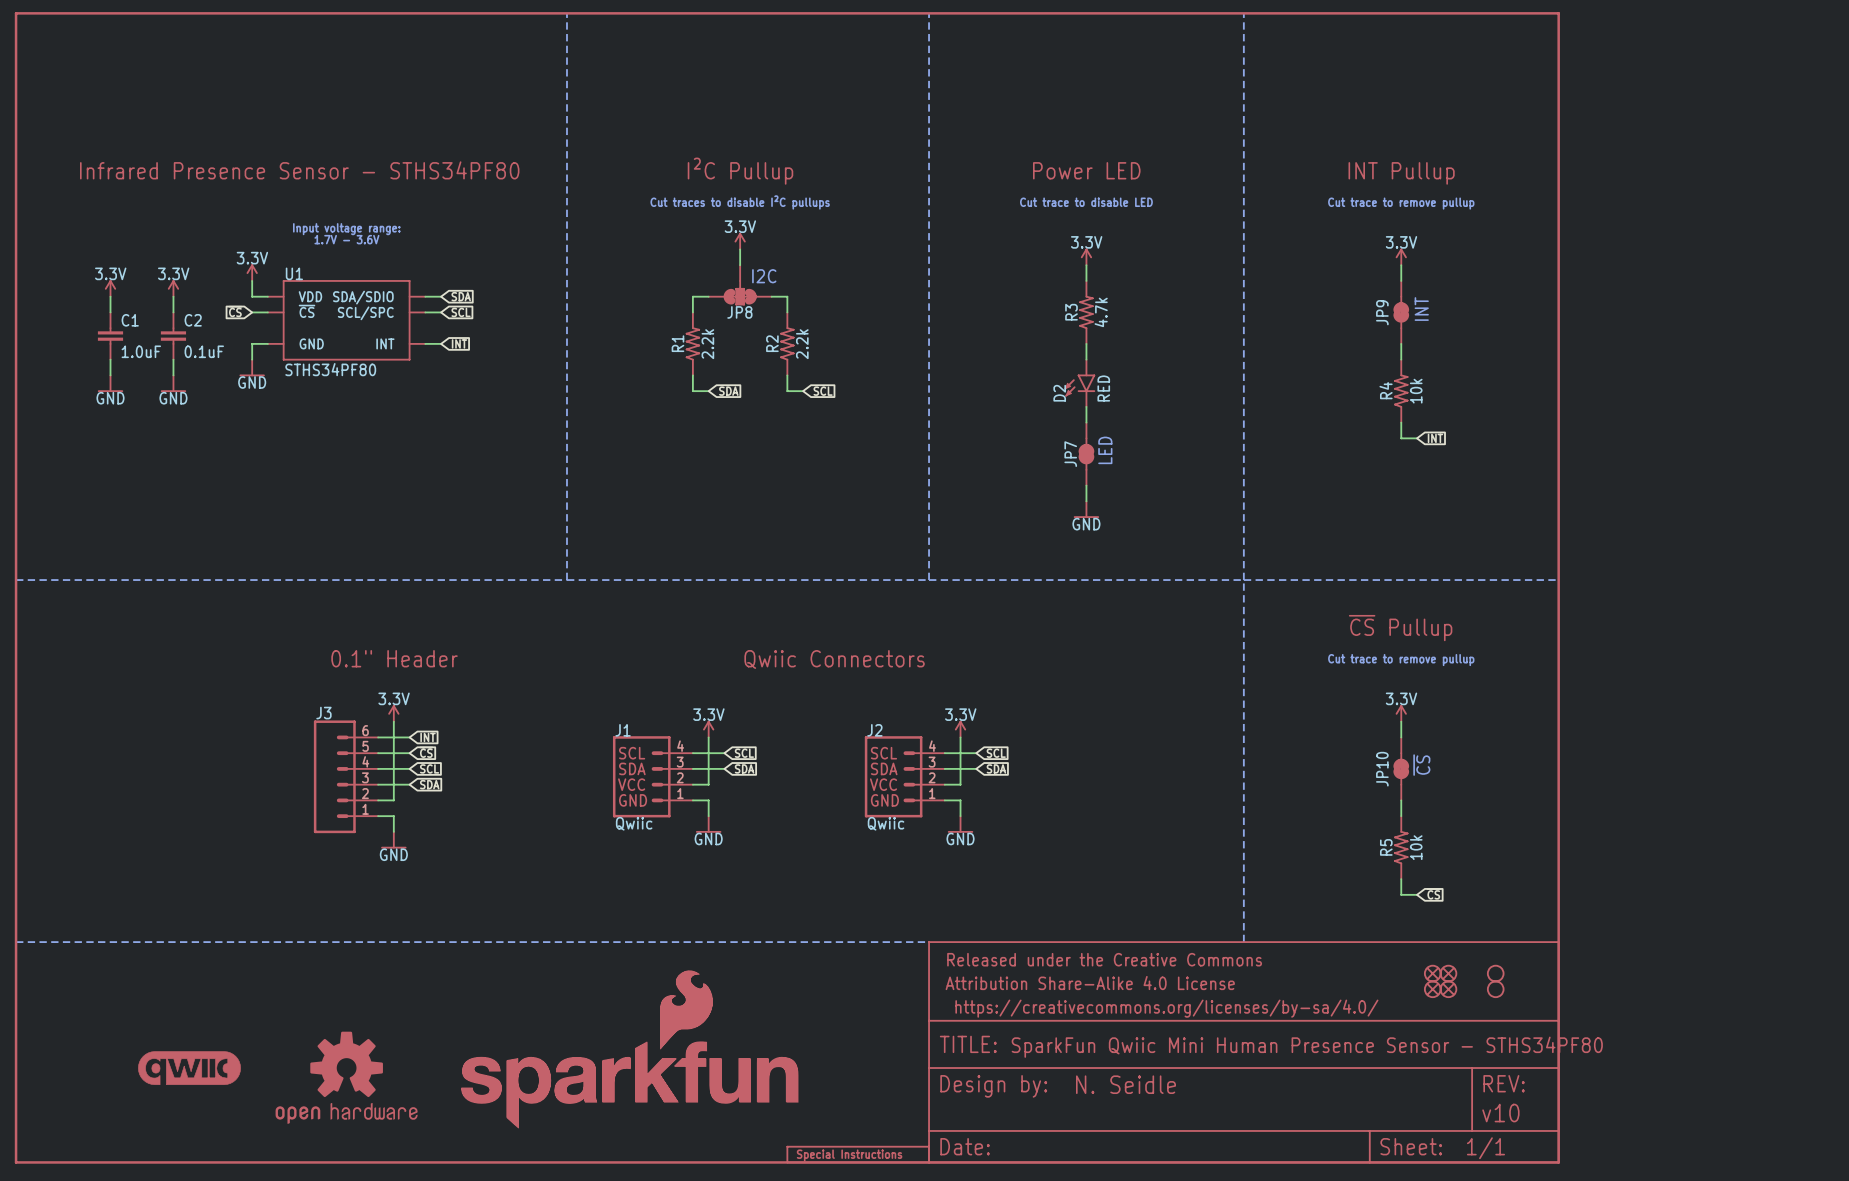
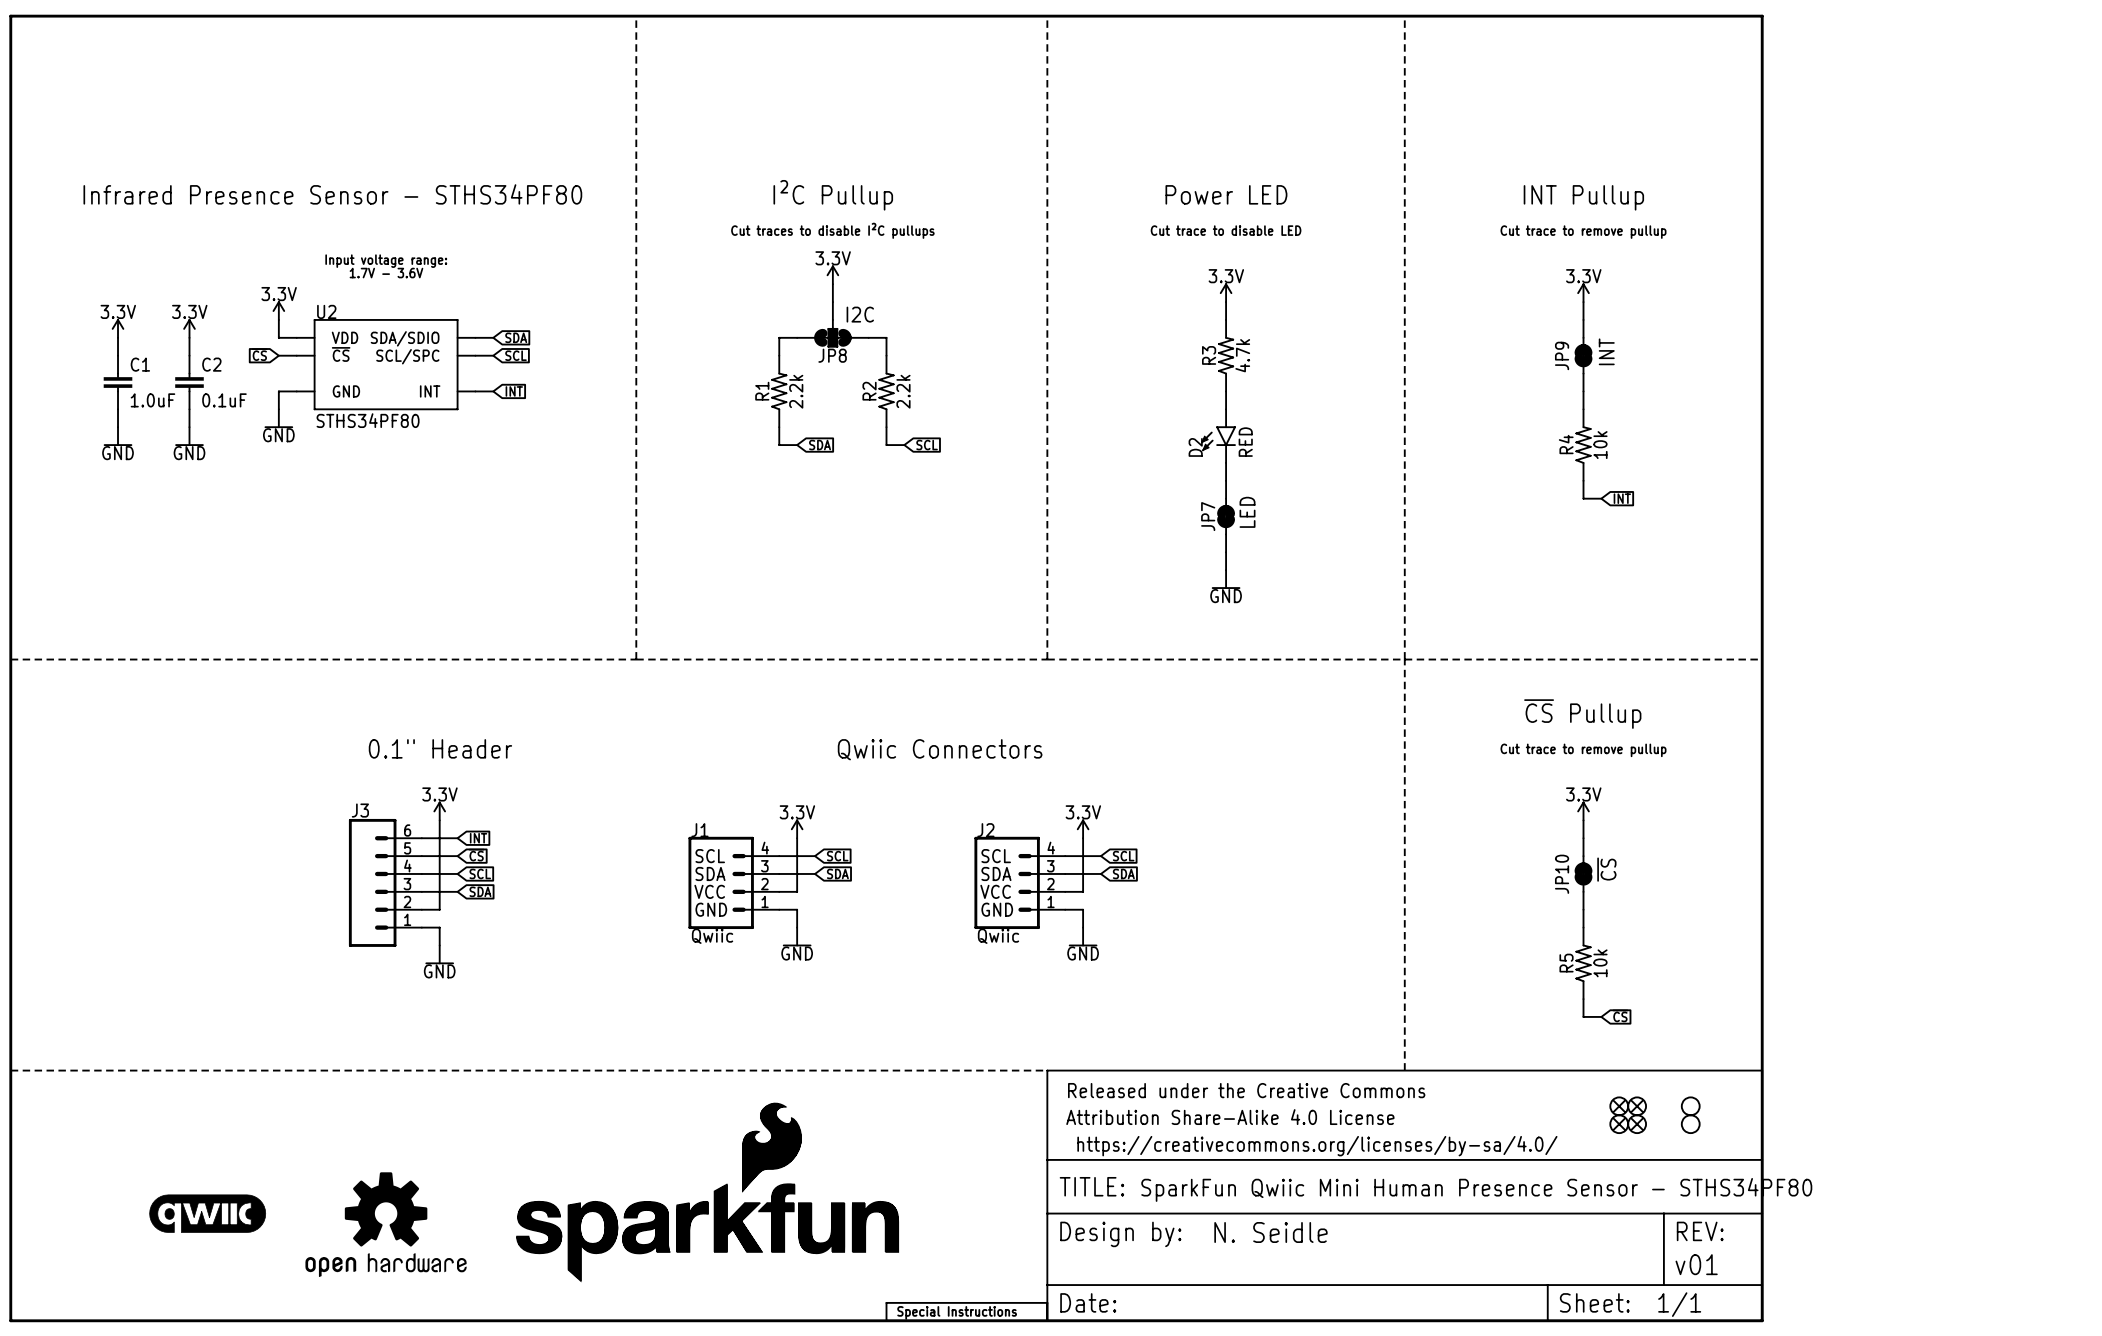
U1 name: U1 (294, 273) -> U2 (326, 311)
part text: v10 (1500, 1113) -> v01 (1696, 1264)

